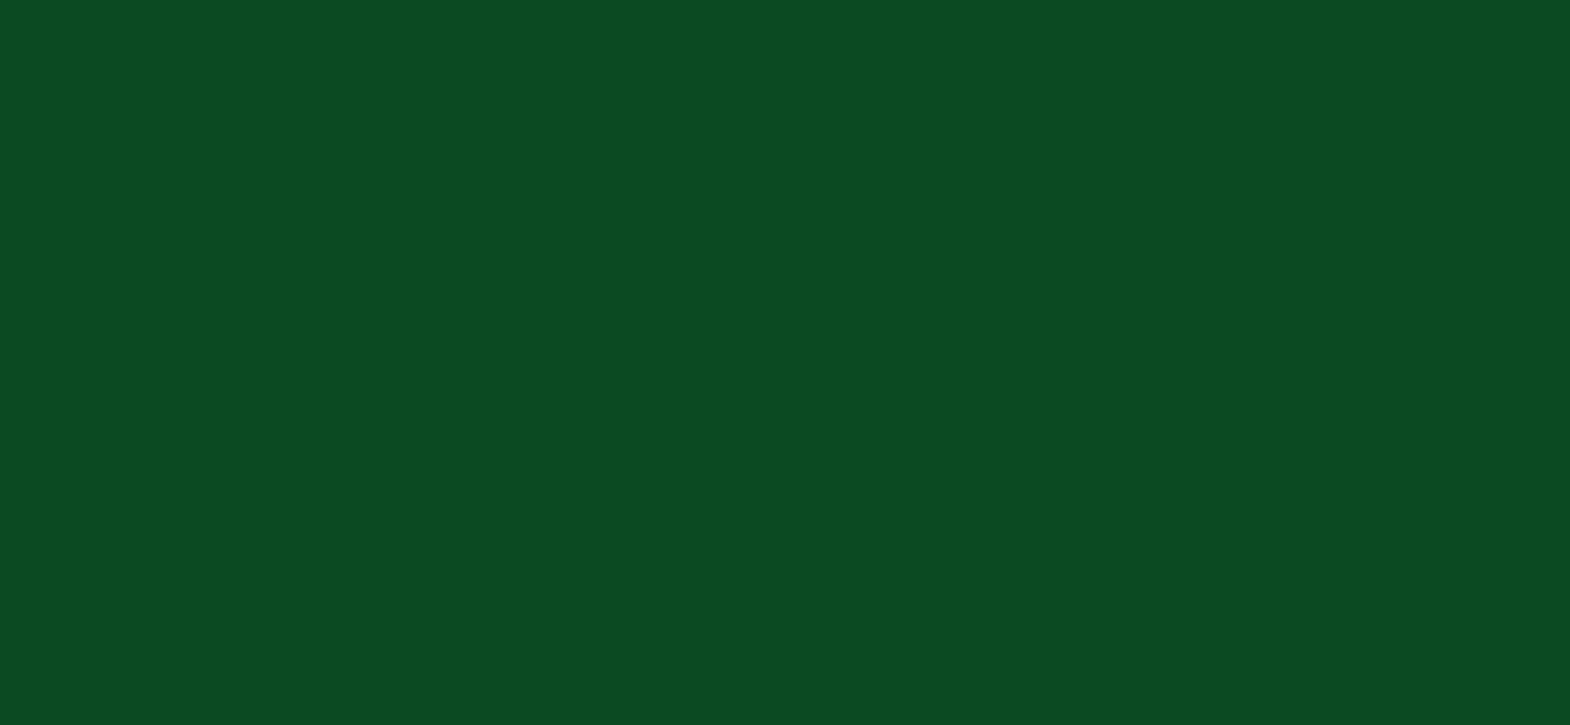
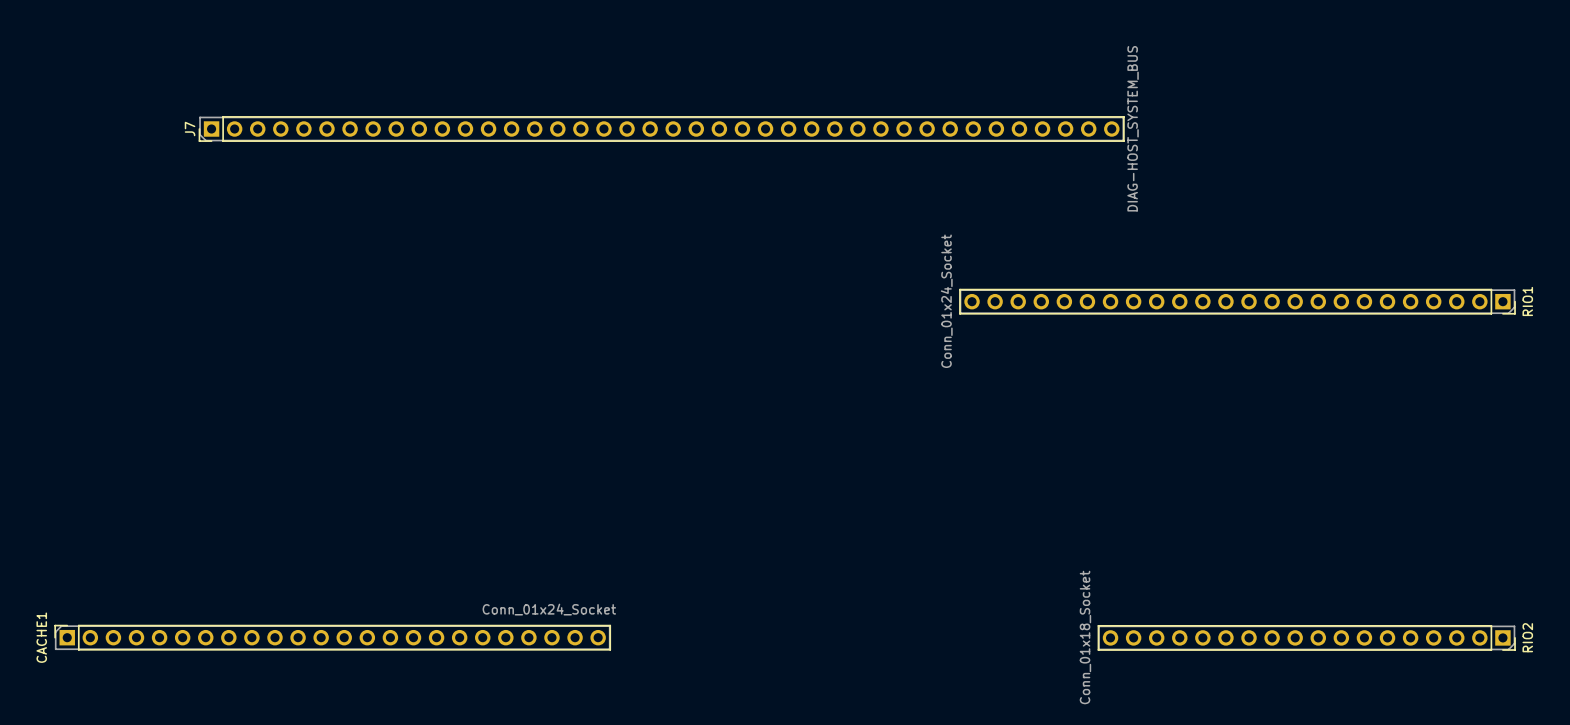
J7: none -> DIAG-HOST_SYSTEM_BUS (661, 129)
RIO1: none -> Conn_01x24_Socket (1237, 301)
CACHE1: none -> Conn_01x24_Socket (332, 637)
RIO2: none -> Conn_01x18_Socket (1306, 637)

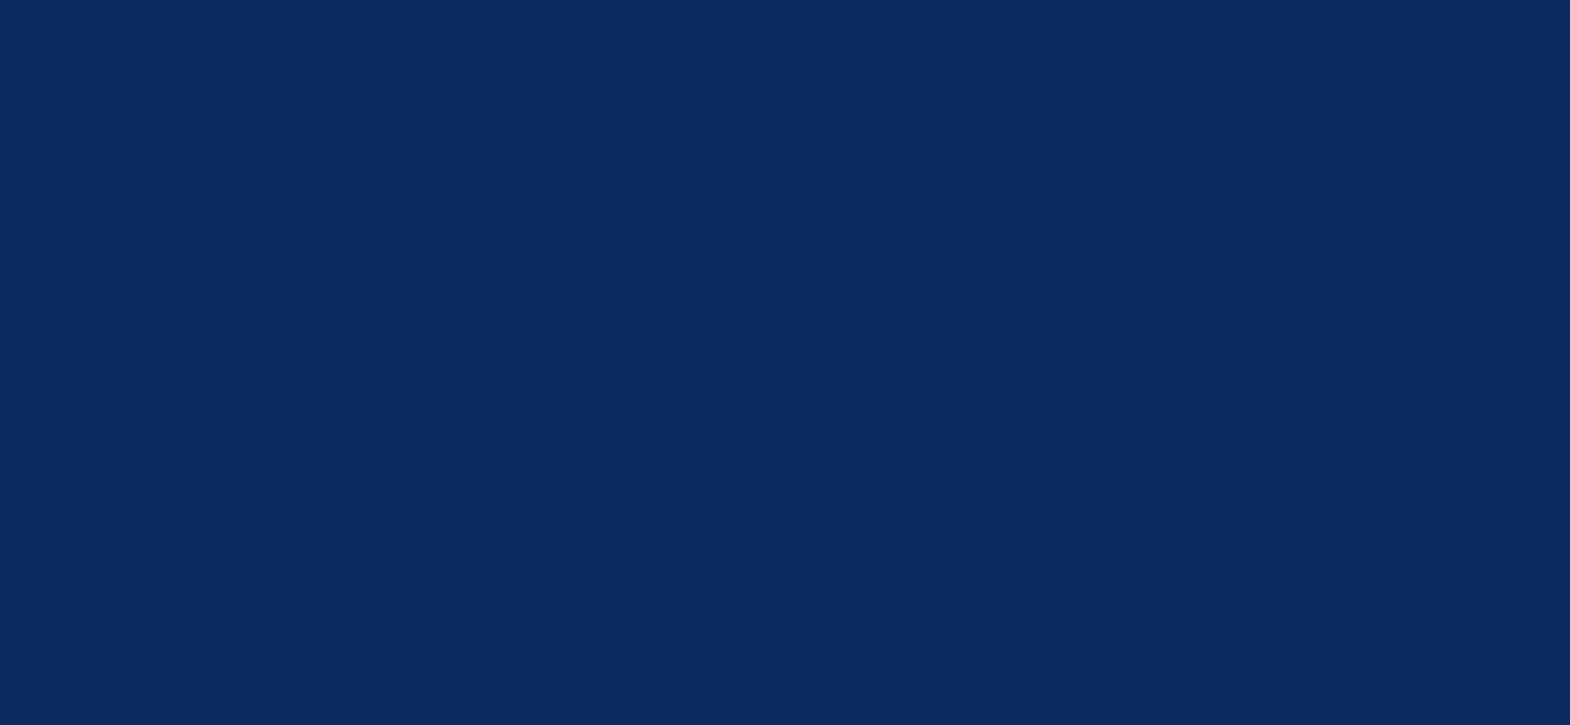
J7: DIAG-HOST_SYSTEM_BUS (661, 129) -> none
RIO1: Conn_01x24_Socket (1237, 301) -> none
CACHE1: Conn_01x24_Socket (332, 637) -> none
RIO2: Conn_01x18_Socket (1306, 637) -> none

